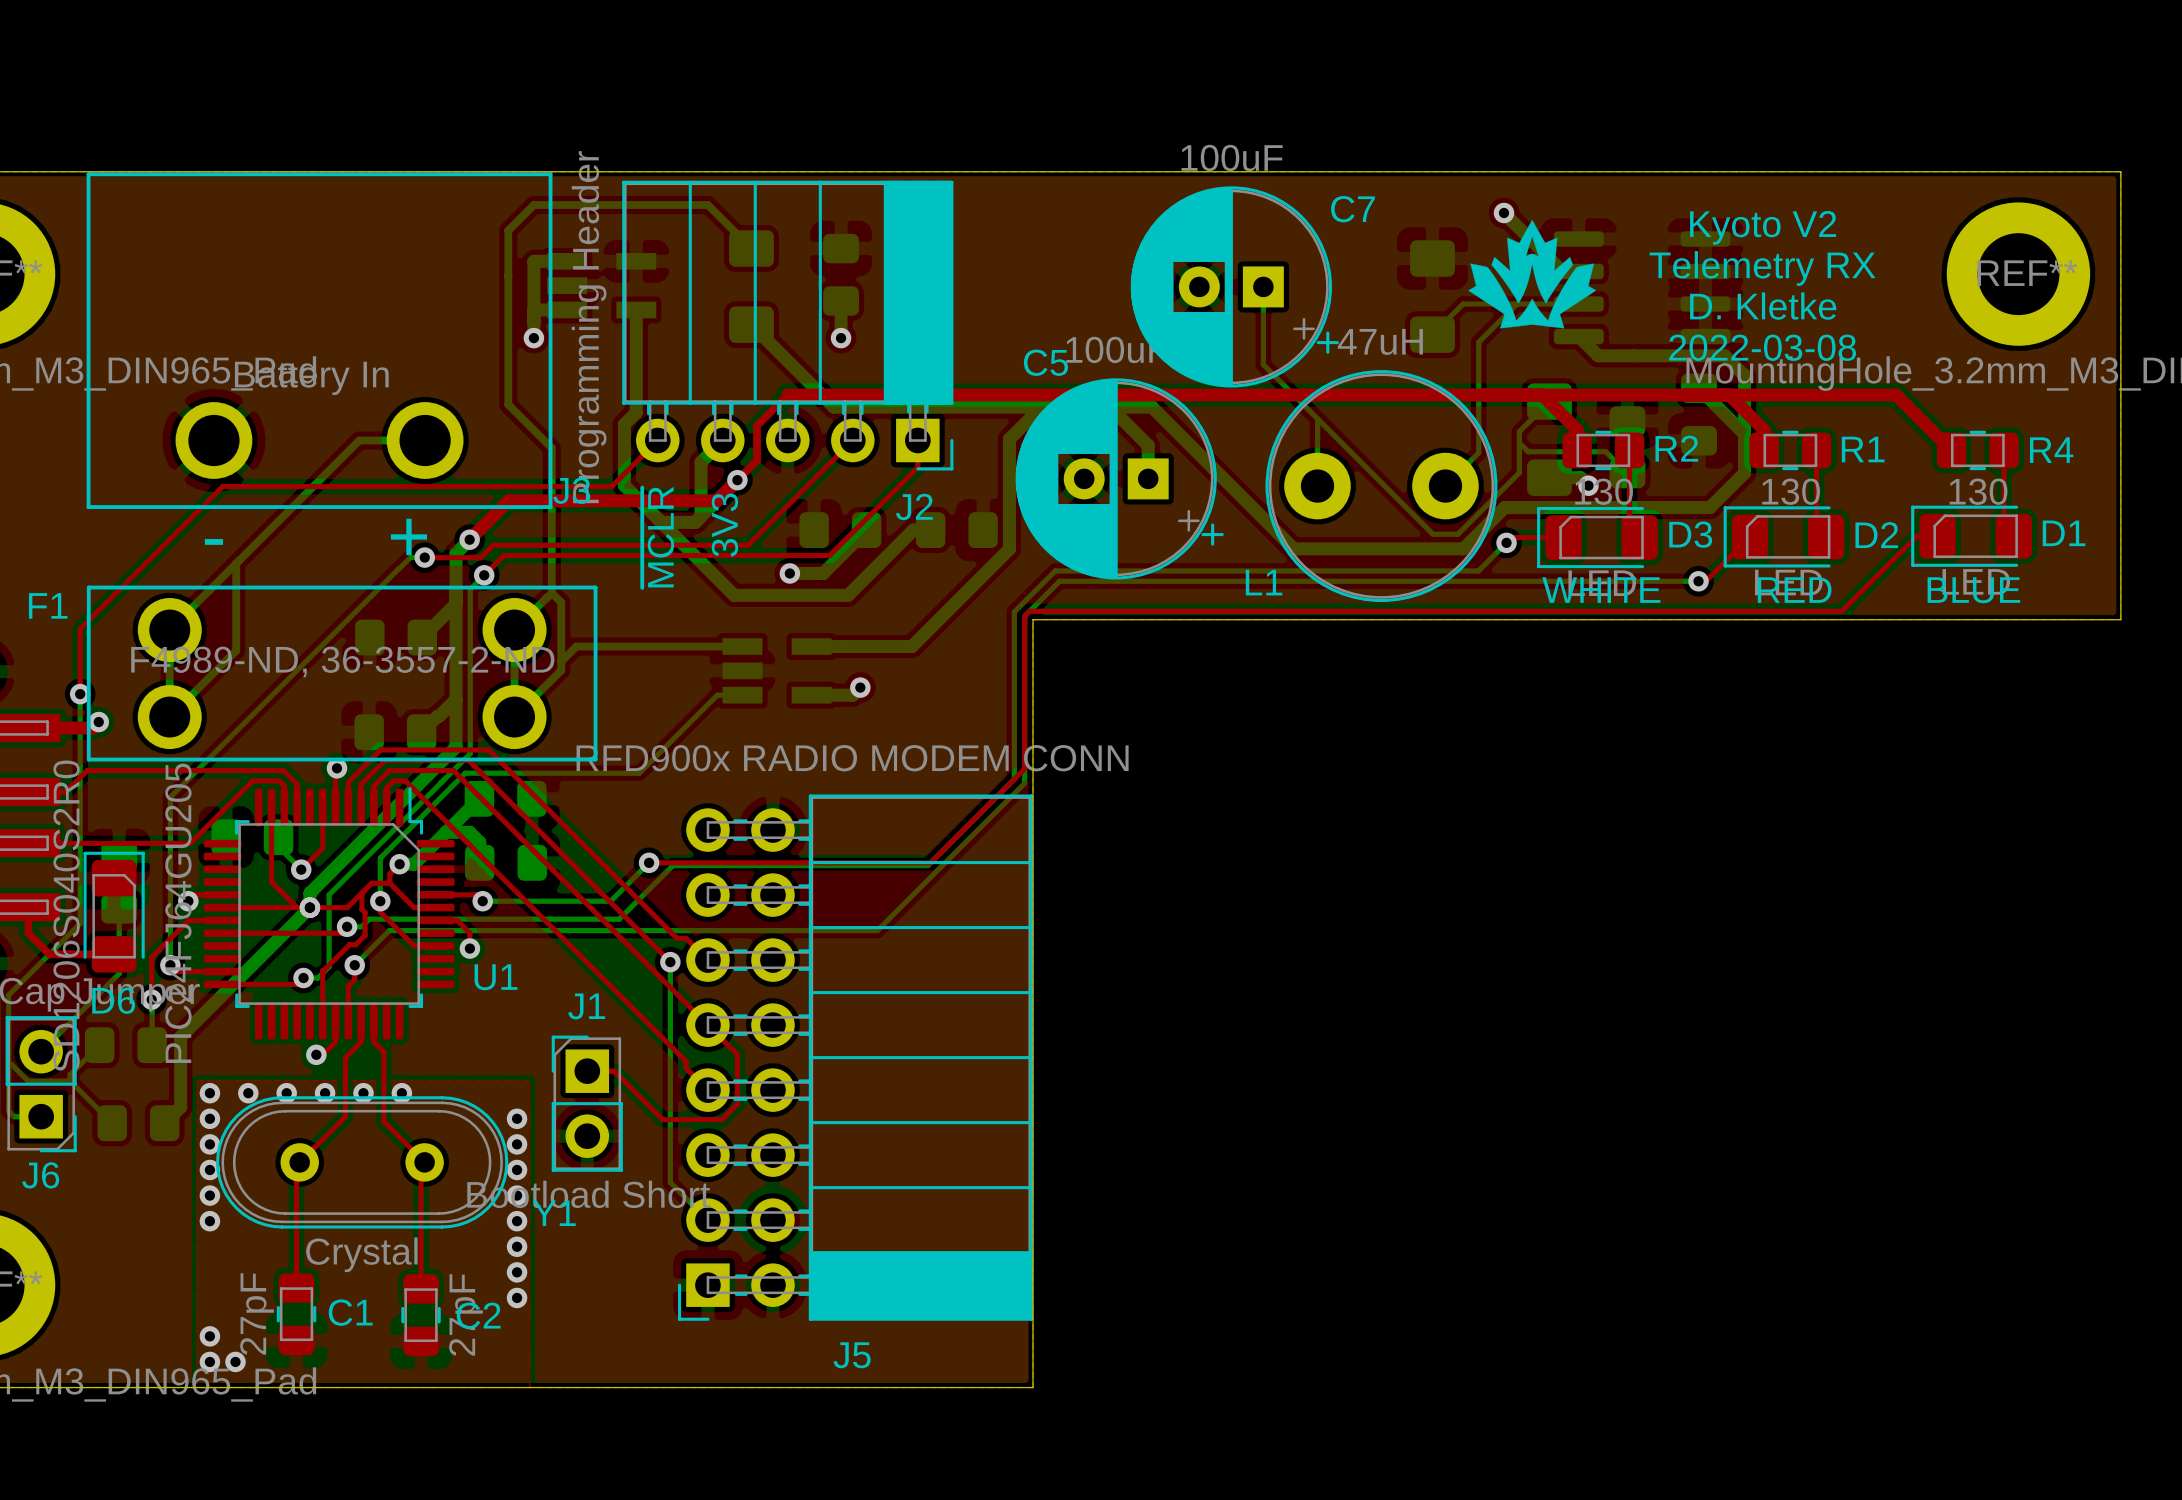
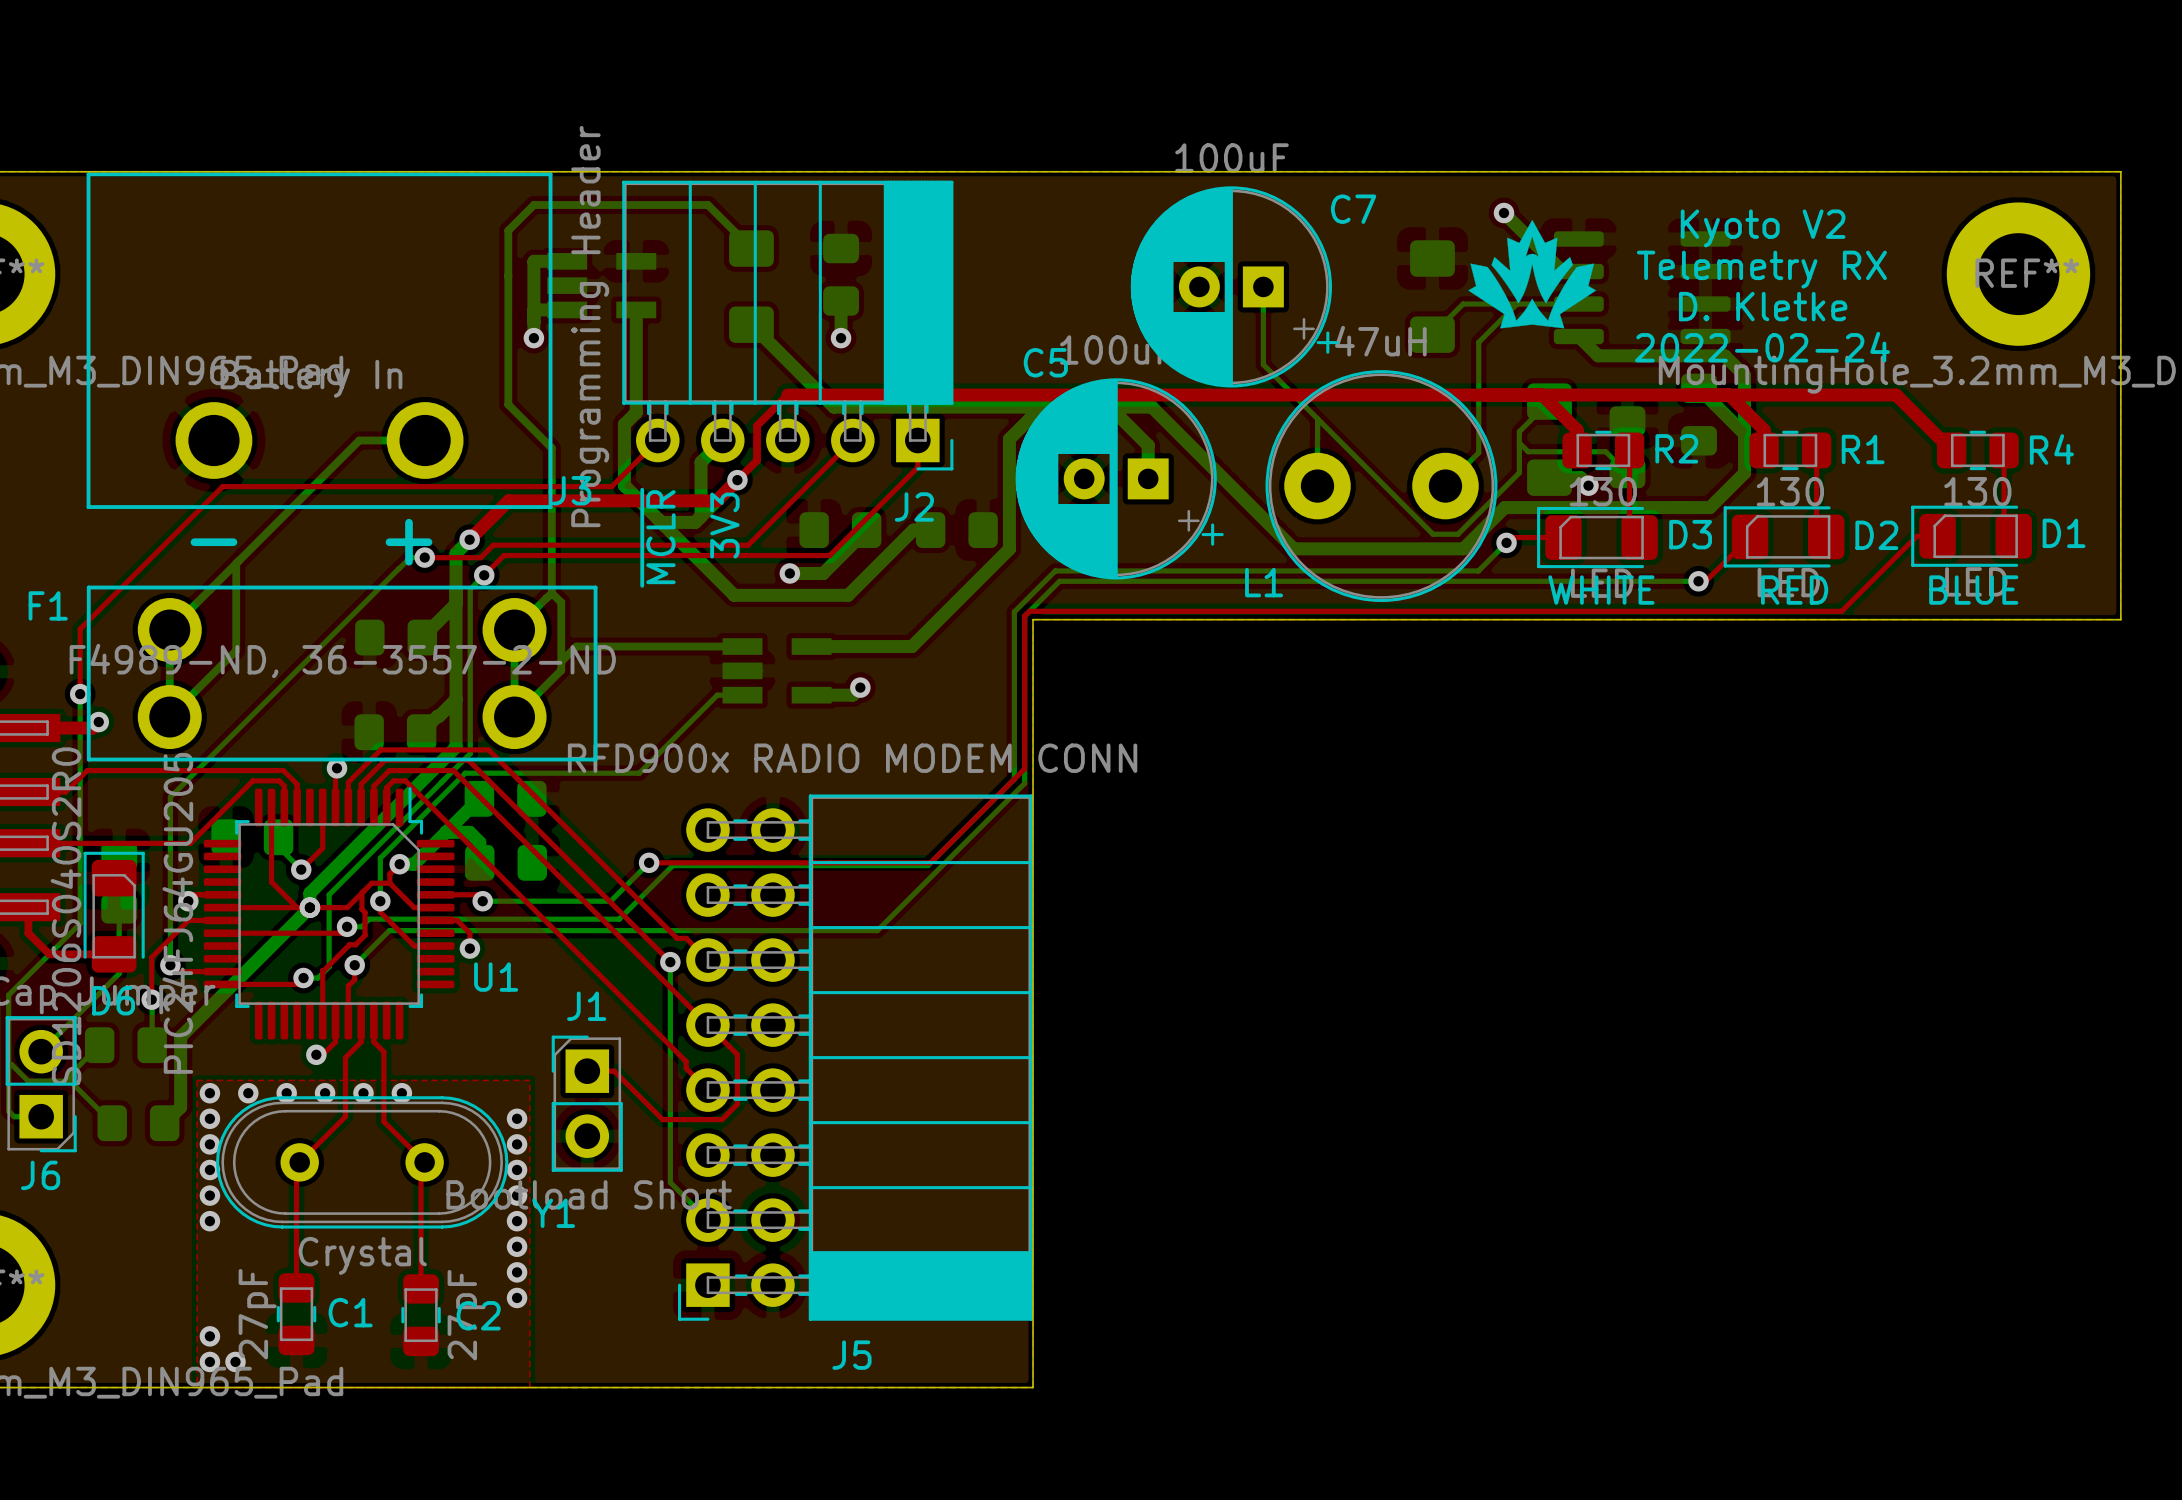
text: 2022-03-08 (1762, 347) -> 2022-02-24 (1762, 347)

